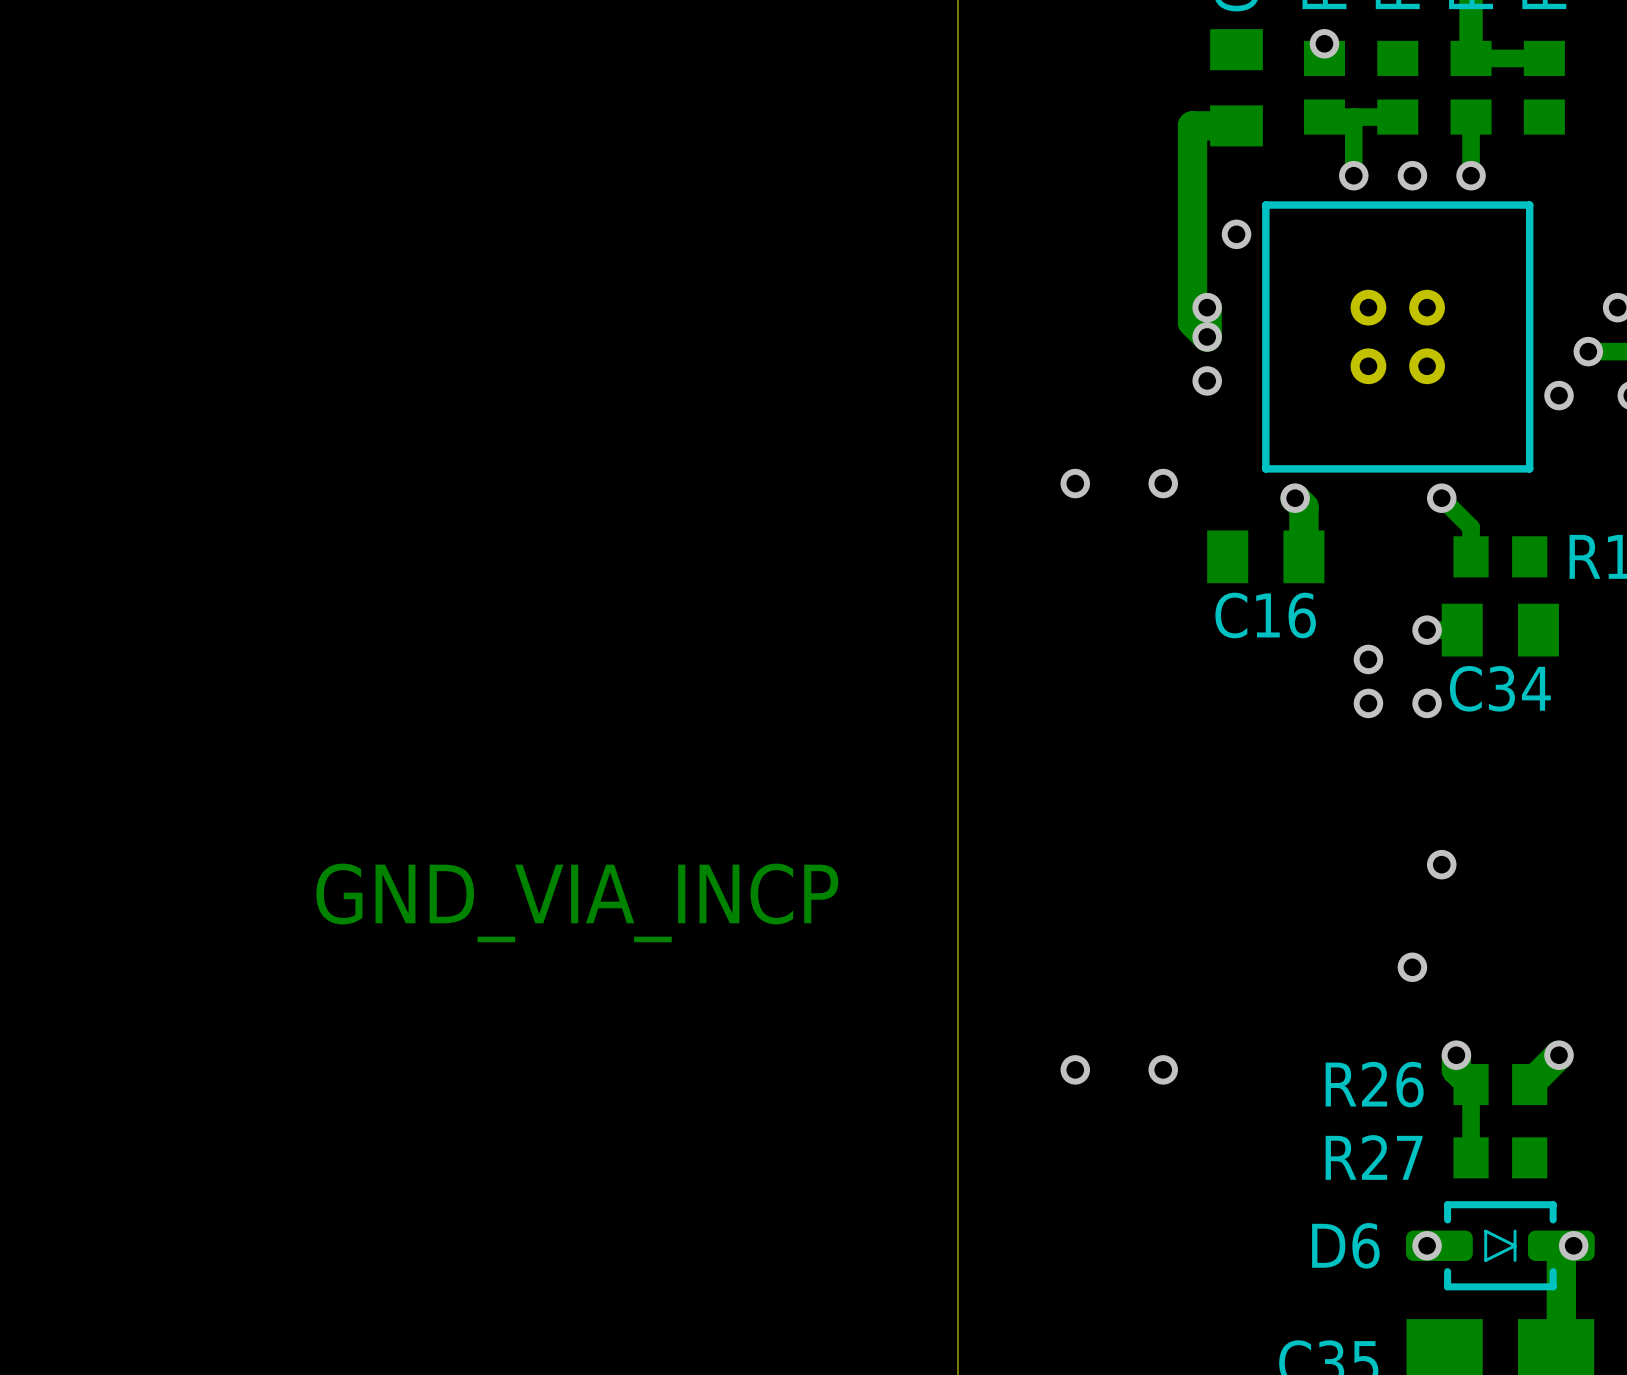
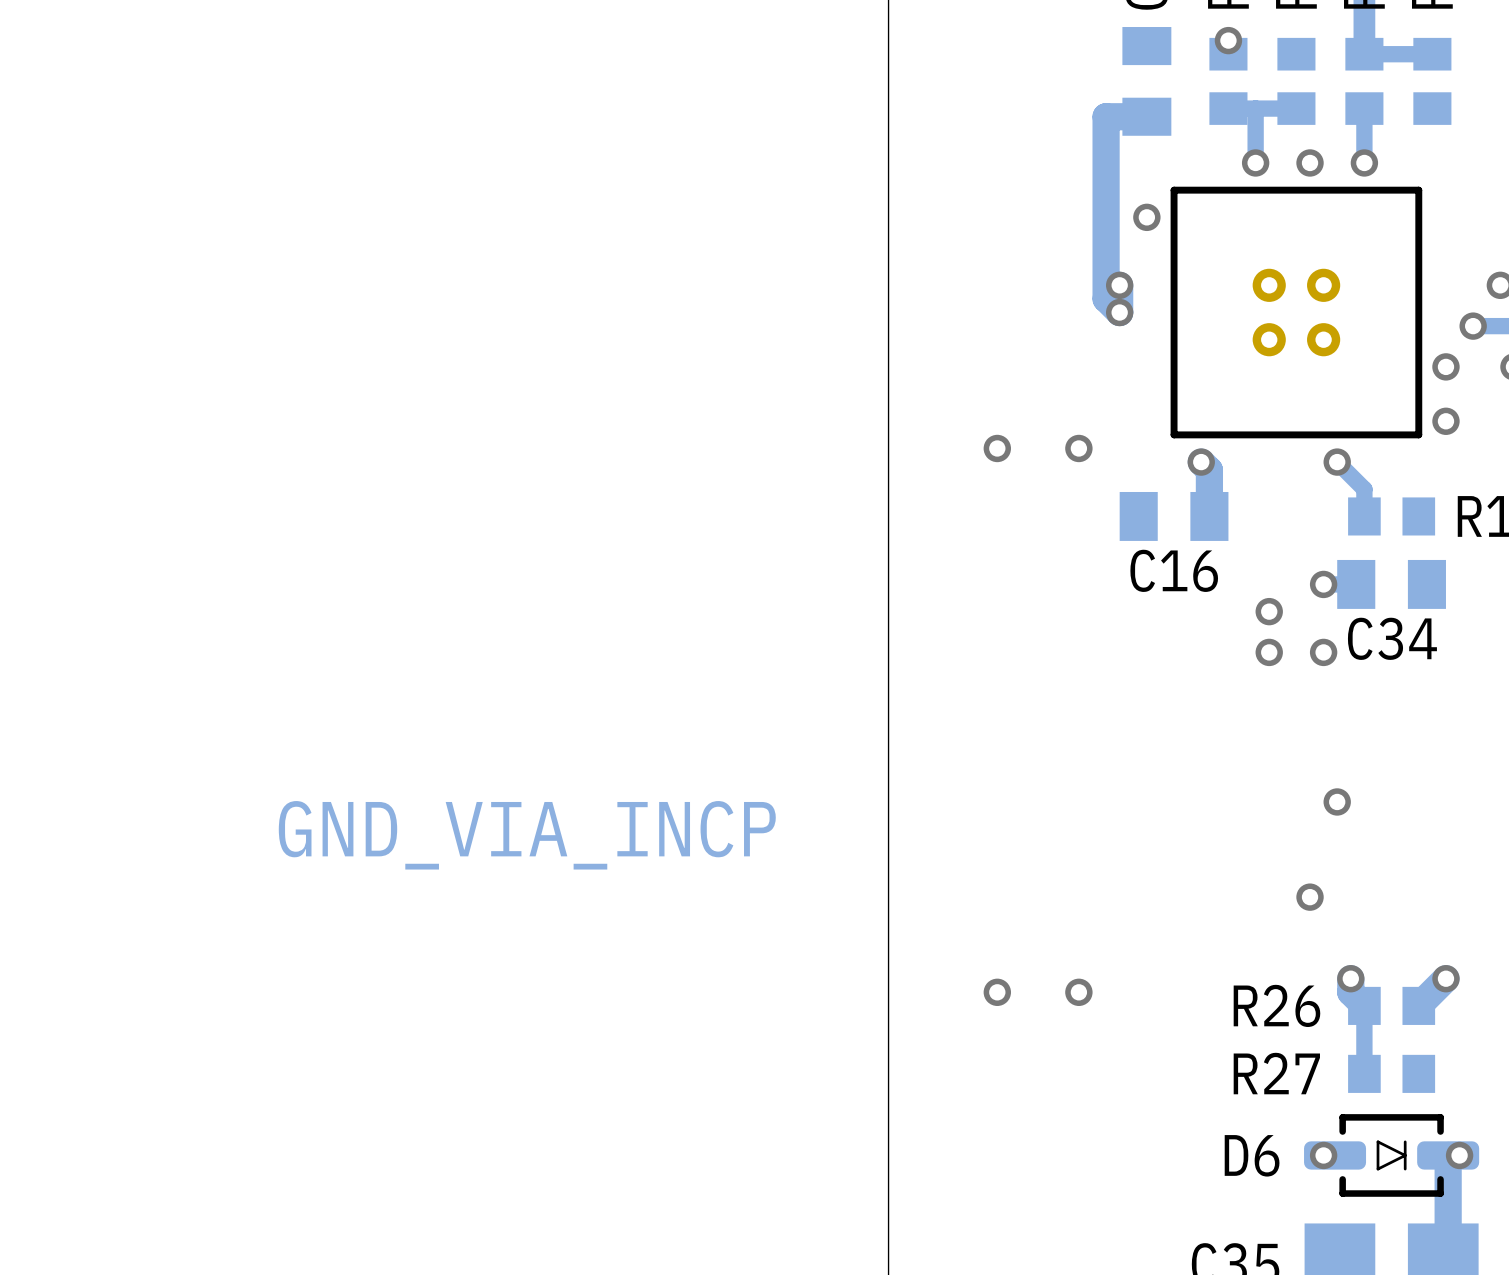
via: (1207, 380) -> none
via: none -> (1445, 421)

